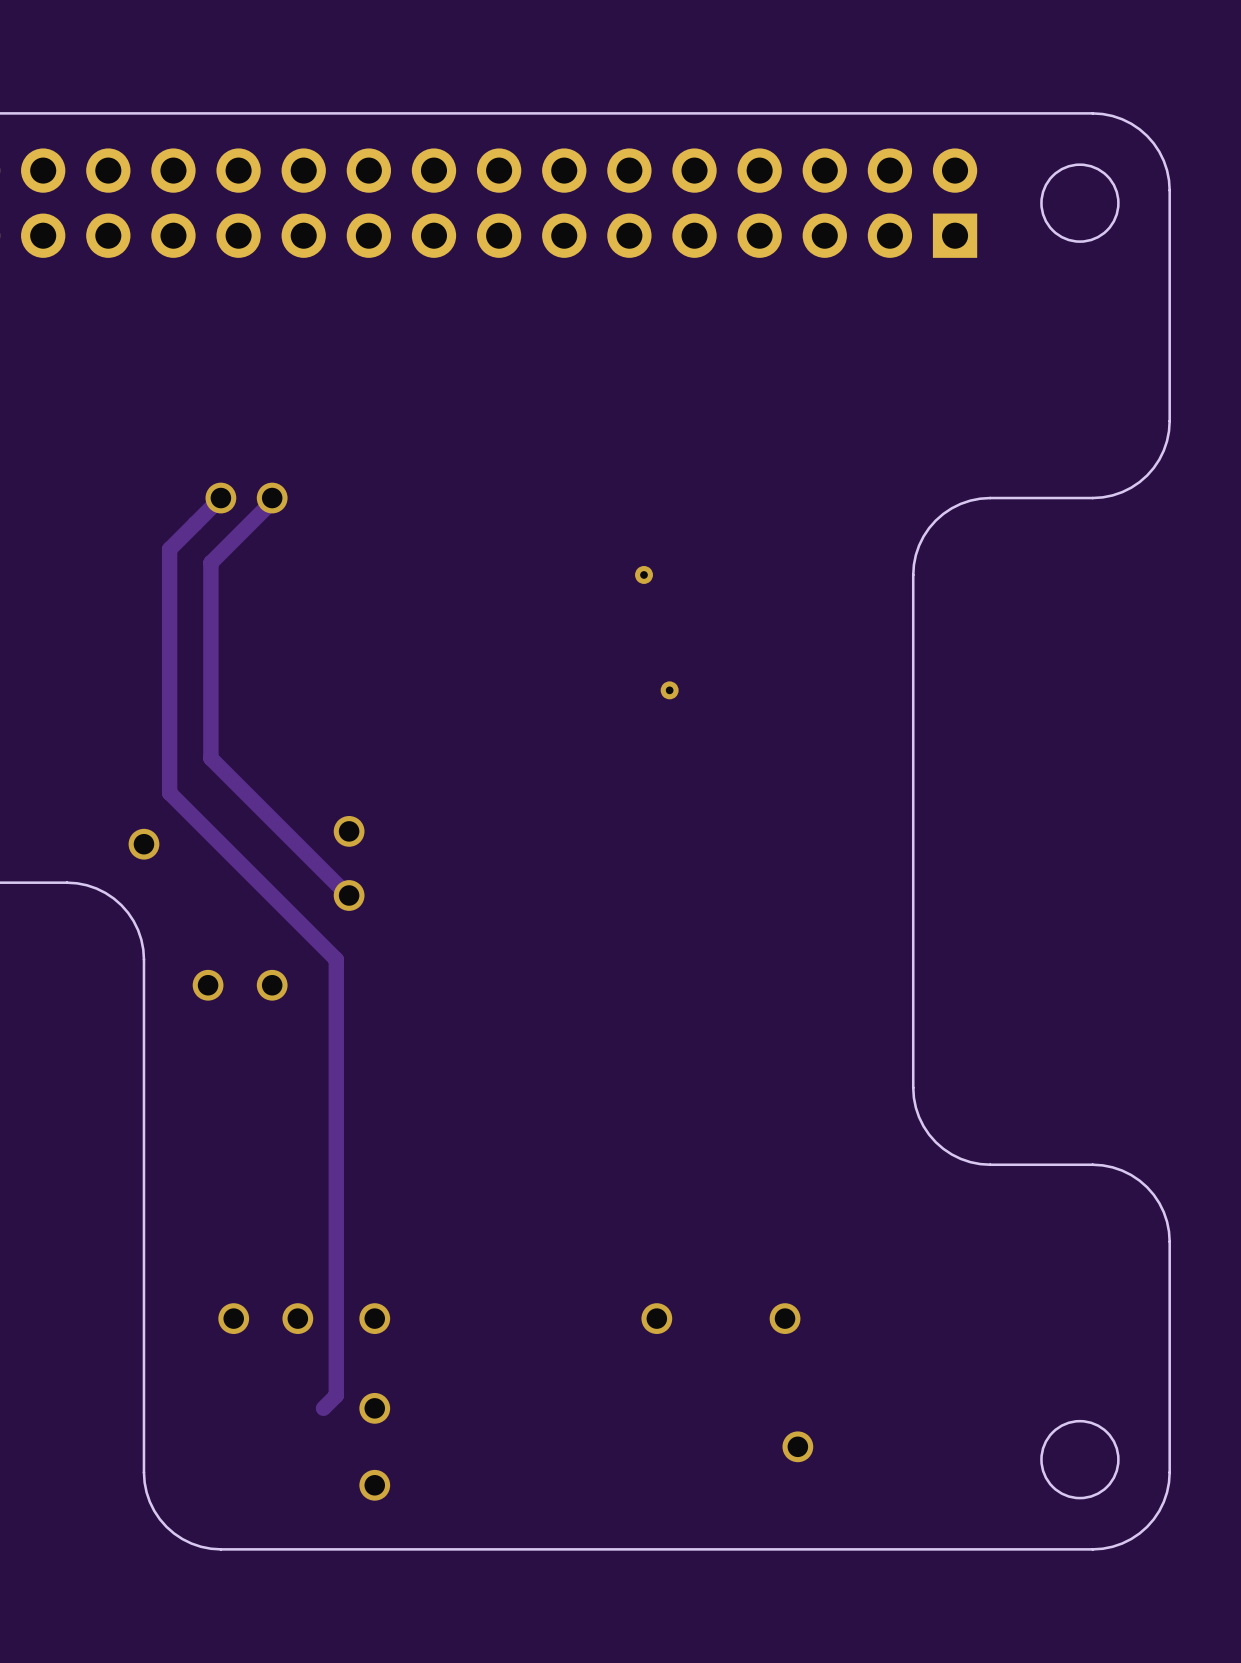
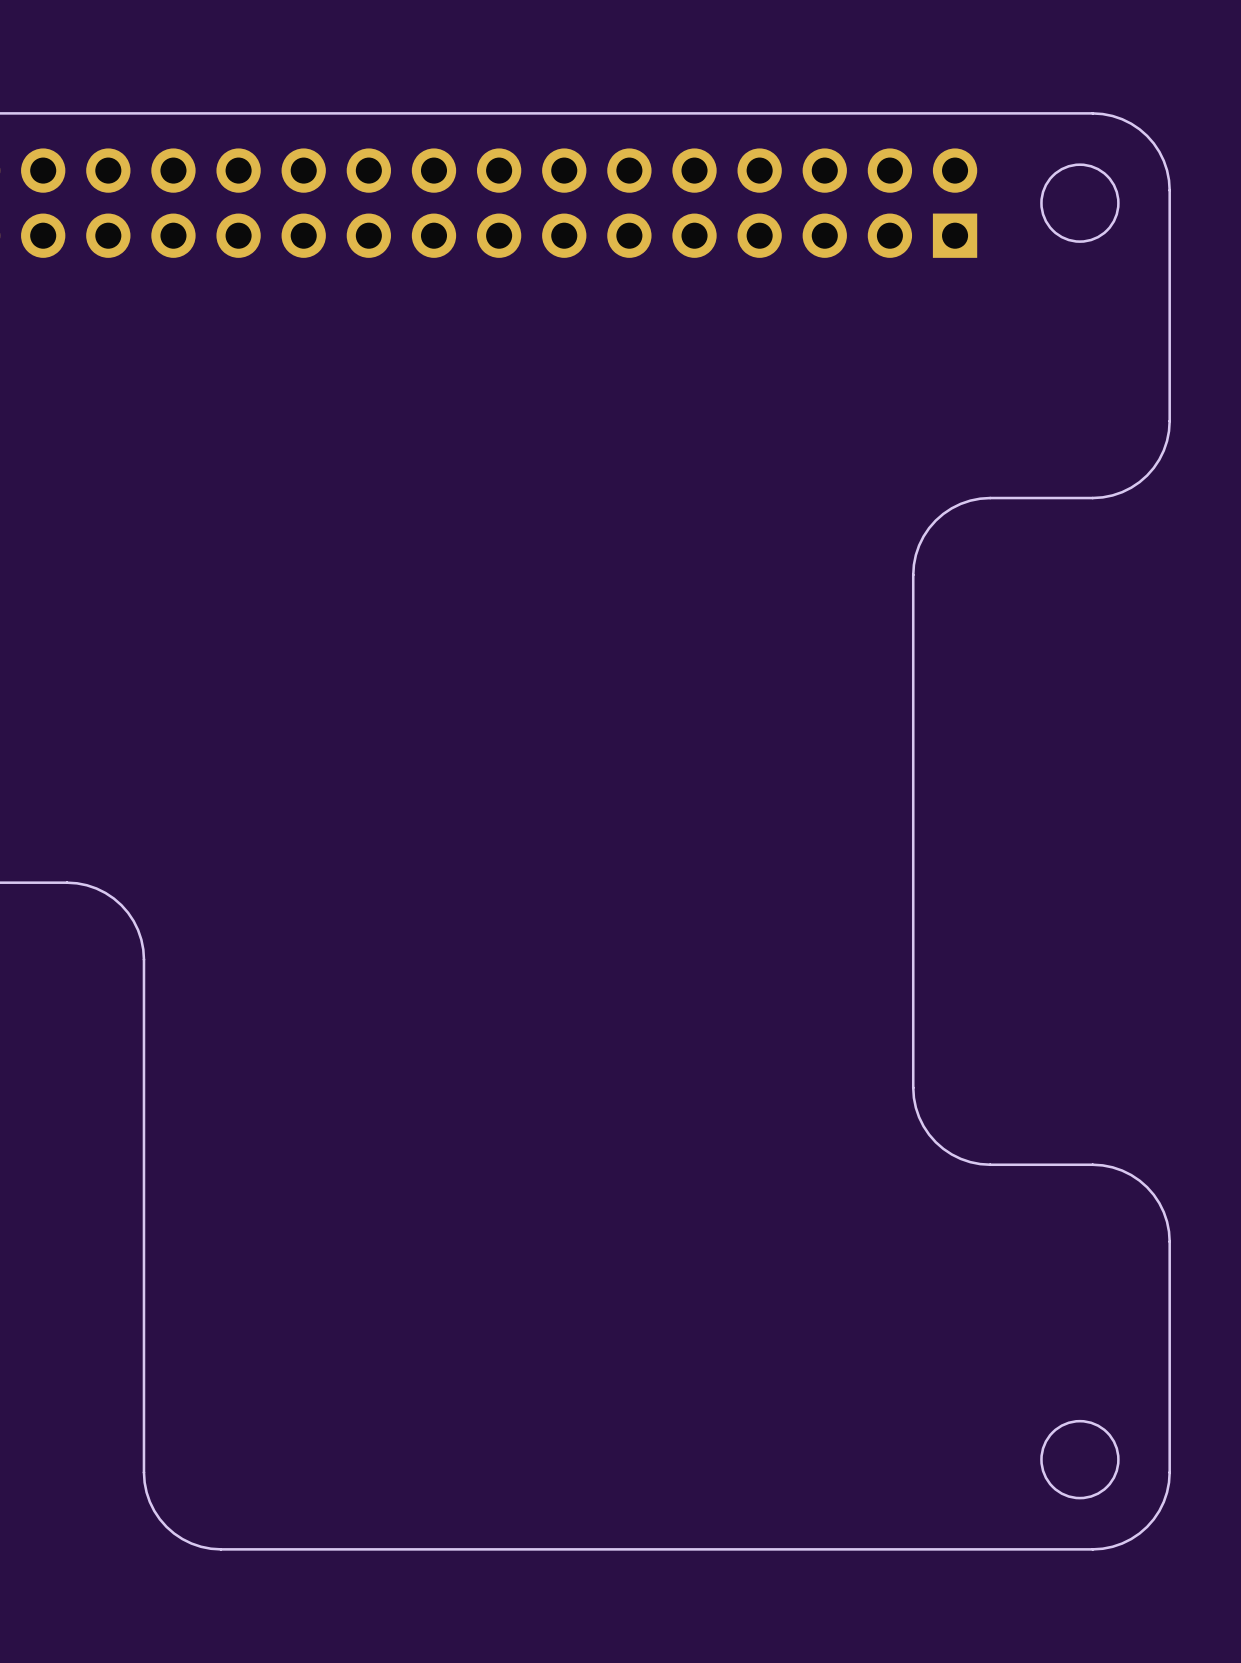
track: (220, 498) (169, 549) (169, 792) (336, 959) (336, 1395) (323, 1408) -> none
via: (220, 498) -> none
track: (272, 498) (272, 501) (210, 562) (210, 758) (341, 888) -> none
via: (272, 498) -> none
via: (644, 574) -> none
via: (669, 690) -> none
via: (349, 831) -> none
via: (143, 844) -> none
via: (349, 895) -> none
via: (208, 985) -> none
via: (272, 985) -> none
via: (233, 1318) -> none
via: (297, 1318) -> none
via: (374, 1318) -> none
via: (656, 1318) -> none
via: (785, 1318) -> none
via: (374, 1408) -> none
via: (797, 1446) -> none
via: (374, 1485) -> none

